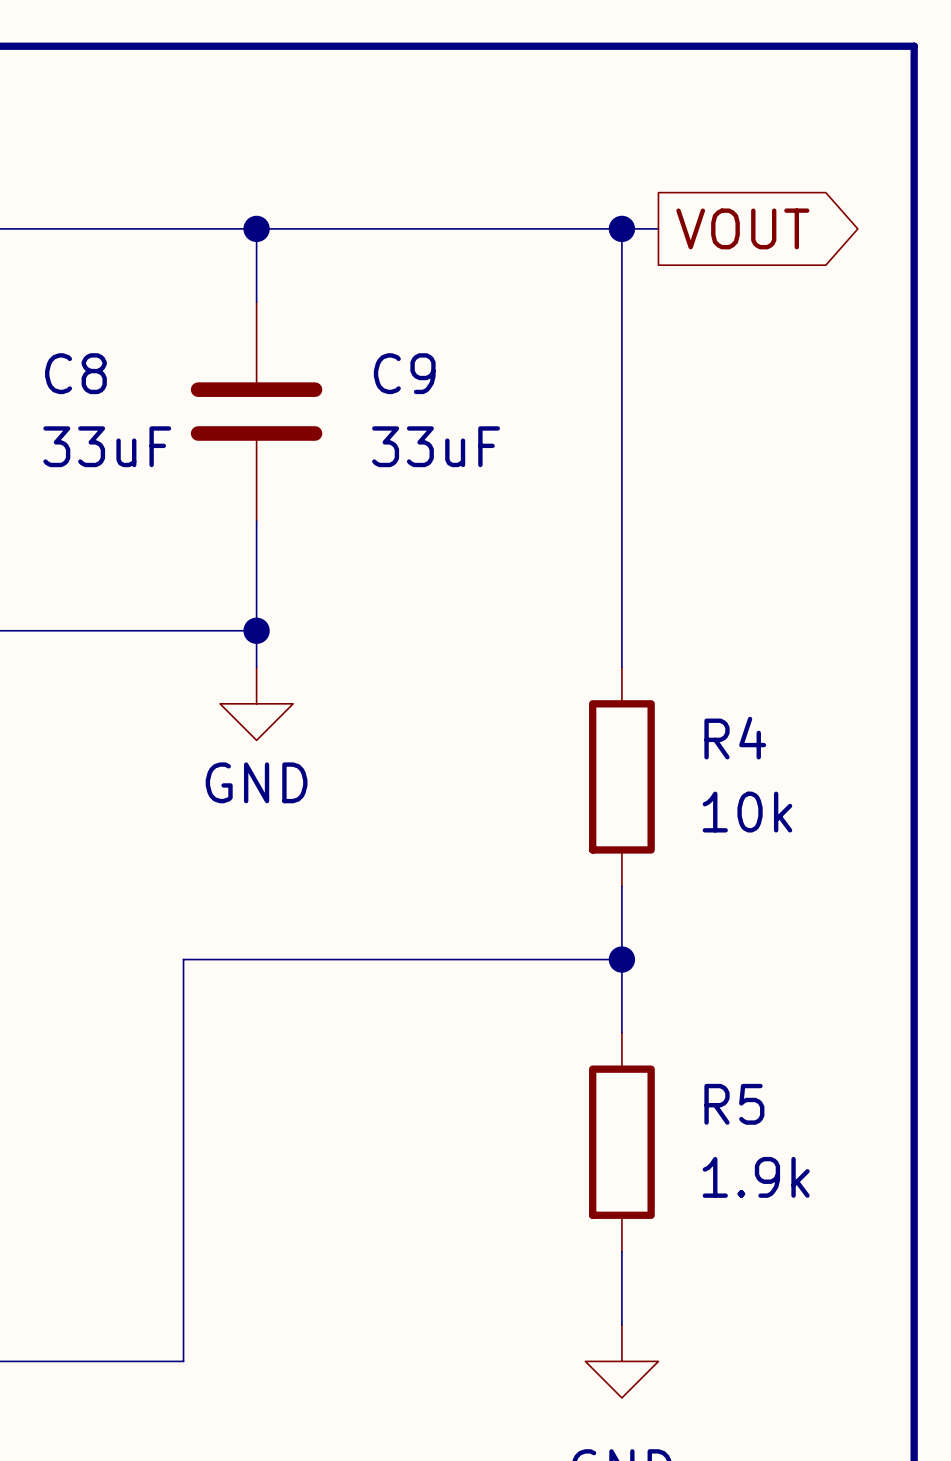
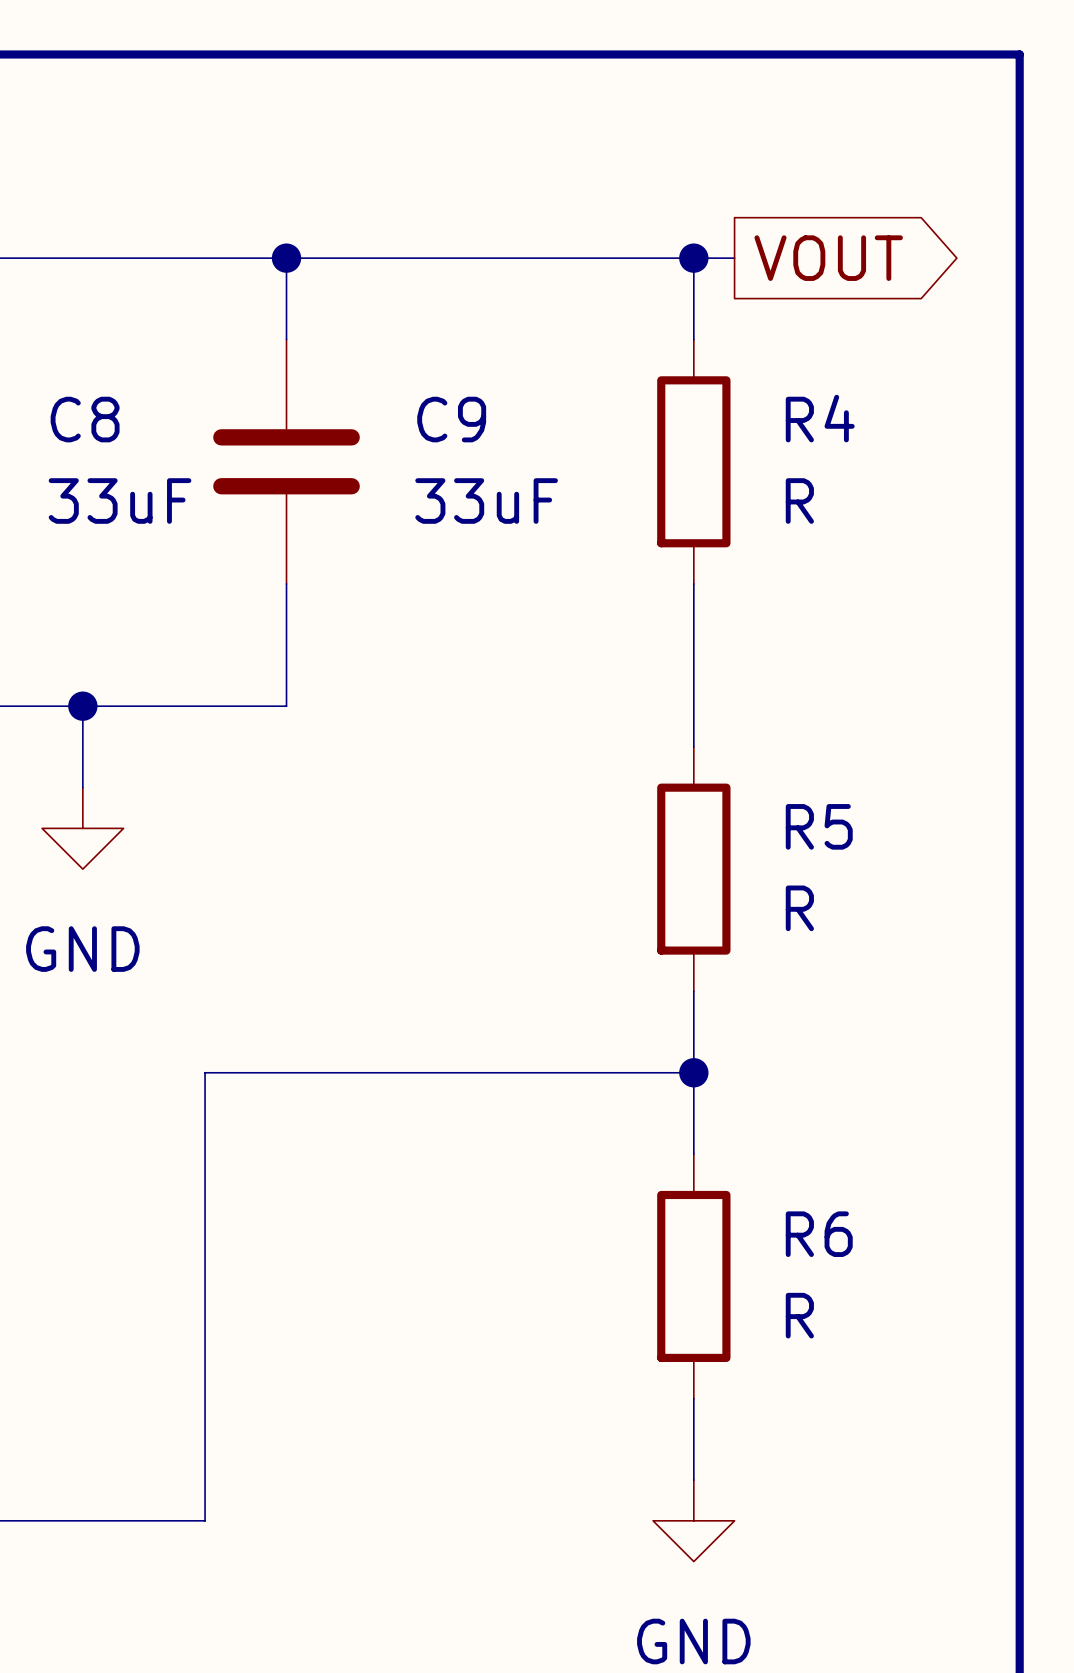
wire: (621, 301) (621, 521) -> none
R4: none -> R (693, 461)
wire: none -> (82, 706) (82, 787)
junction: none -> (82, 706)
wire: (256, 630) (256, 667) -> none
junction: (256, 630) -> none
power symbol position: GND (256, 703) -> GND (82, 828)
R4 name: R4 (735, 738) -> R5 (819, 826)
power symbol text position: GND (256, 782) -> GND (82, 949)
R4 value: 10k (747, 812) -> R (799, 908)
R5 name: R5 (734, 1104) -> R6 (819, 1234)
R5 value: 1.9k (756, 1177) -> R (799, 1315)

